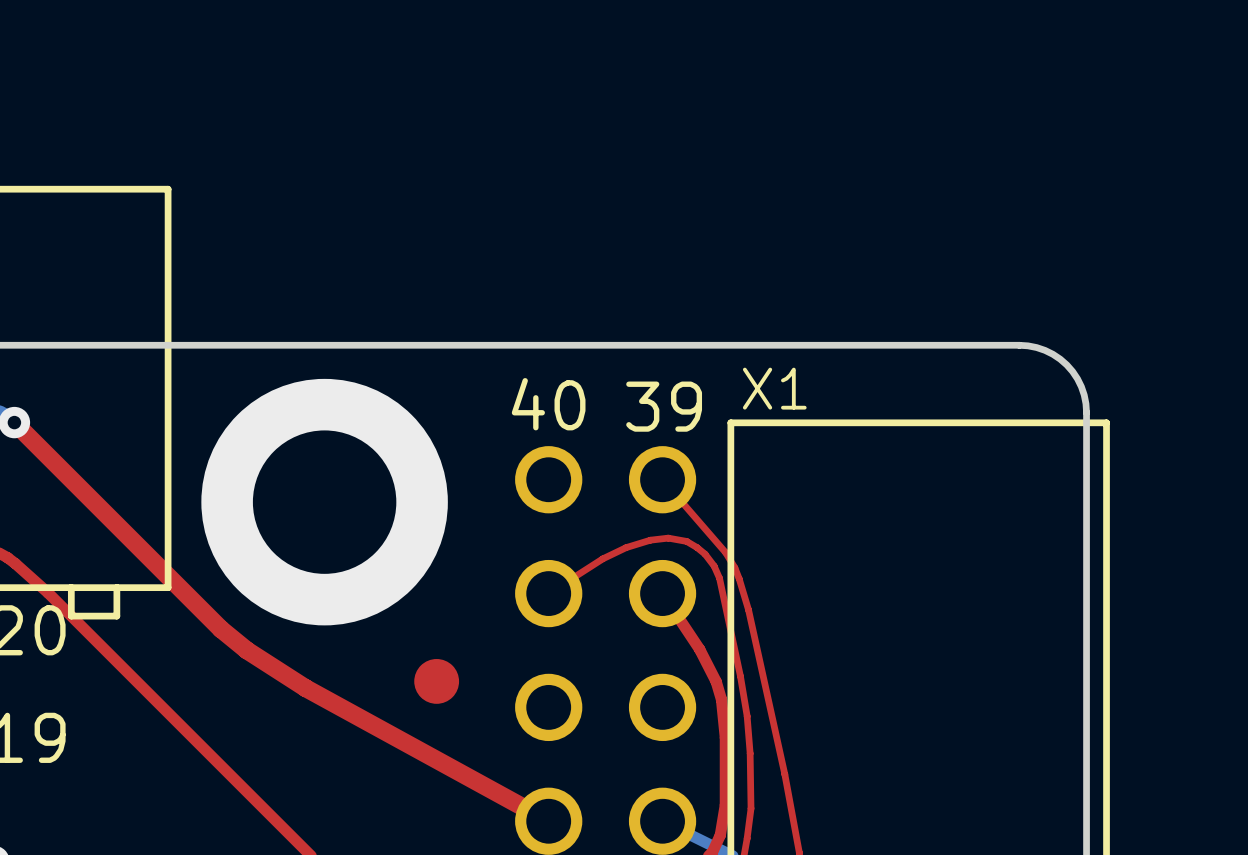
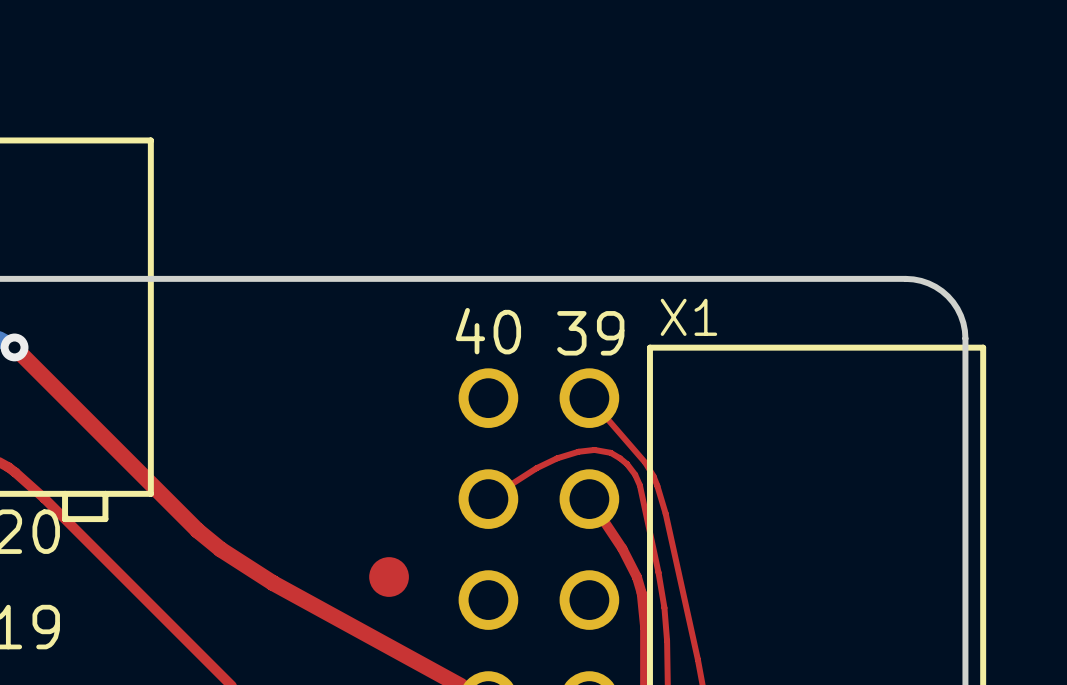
via: (324, 502) -> none

